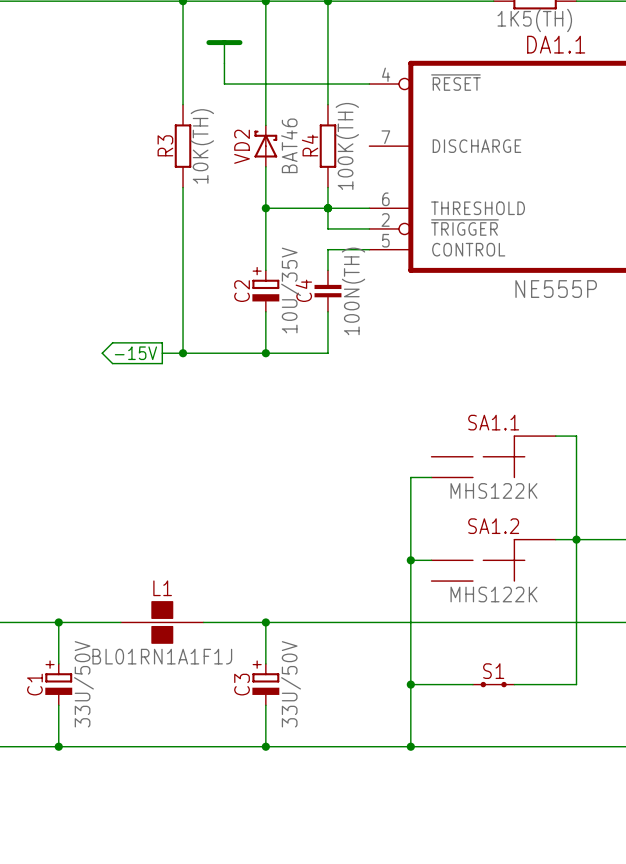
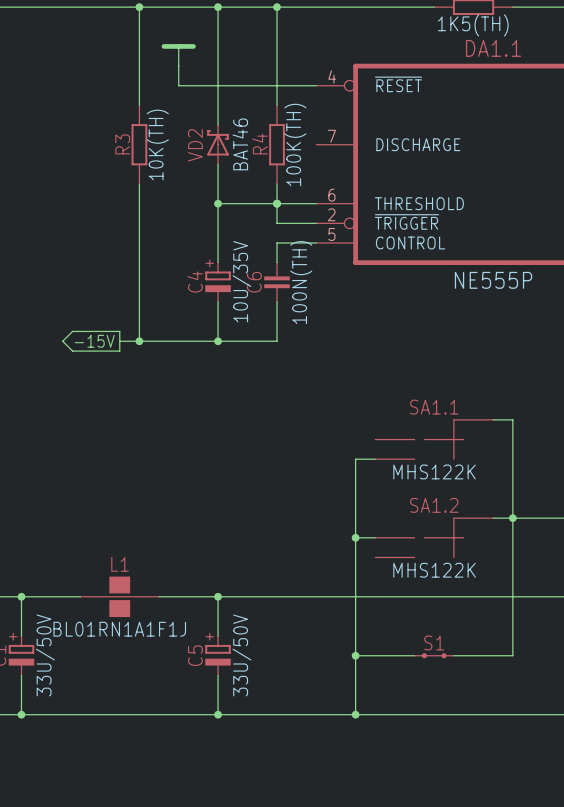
C4 name: C4 (303, 290) -> C6 (254, 282)
C2 name: C2 (242, 291) -> C4 (195, 282)
C3 name: C3 (242, 684) -> C5 (195, 655)

